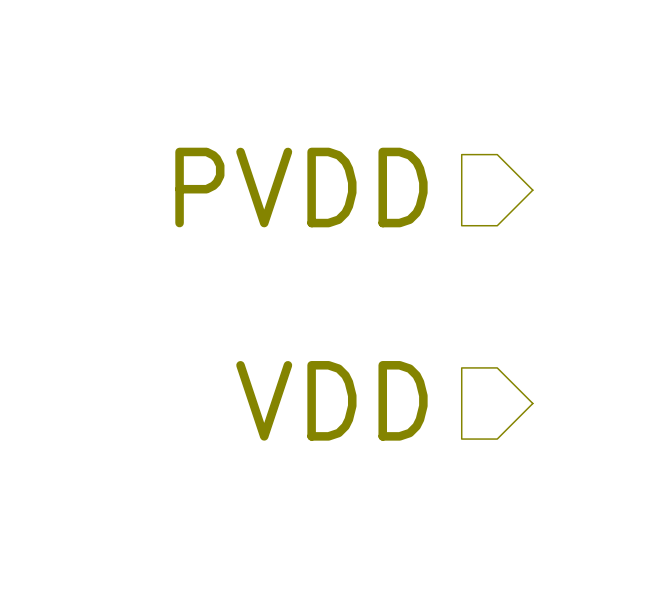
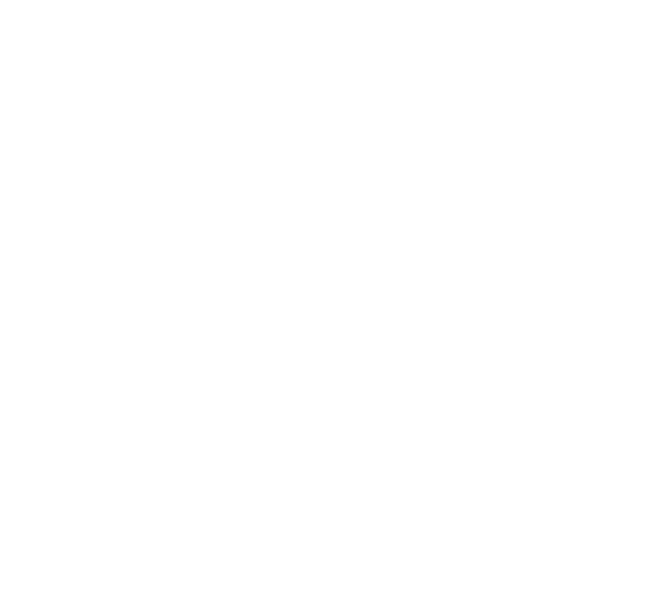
hierarchical label: PVDD (301, 187) -> none
hierarchical label: VDD (331, 400) -> none

